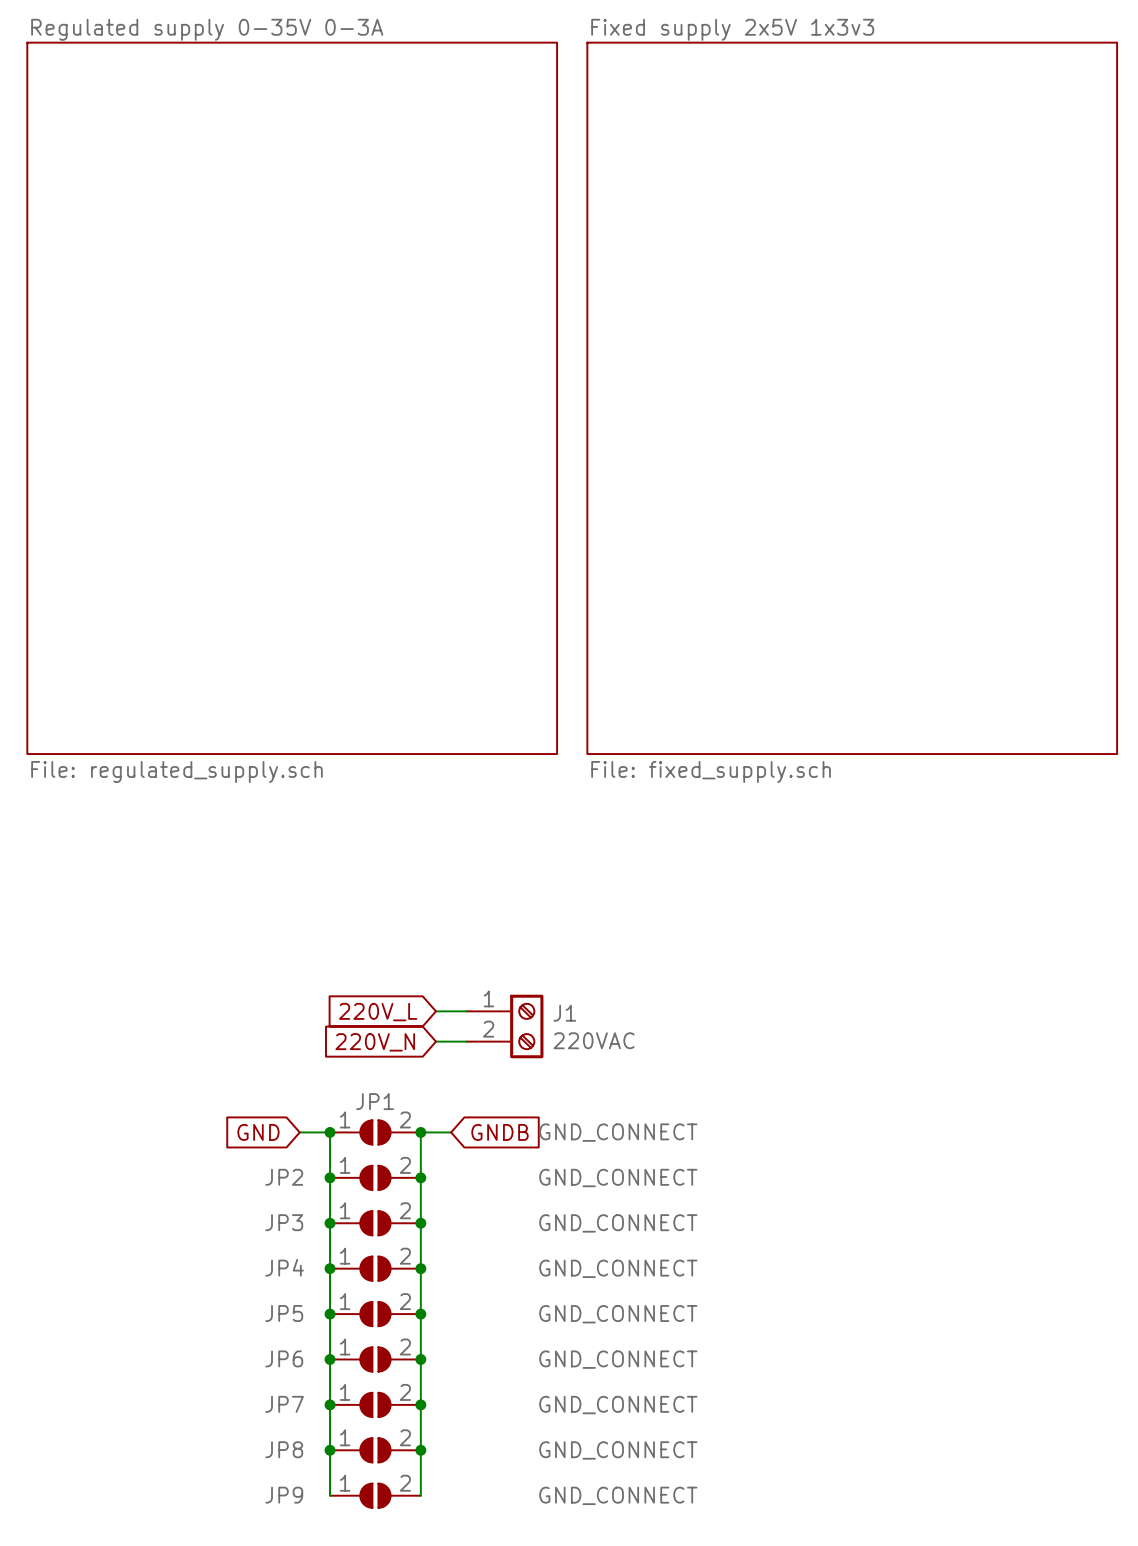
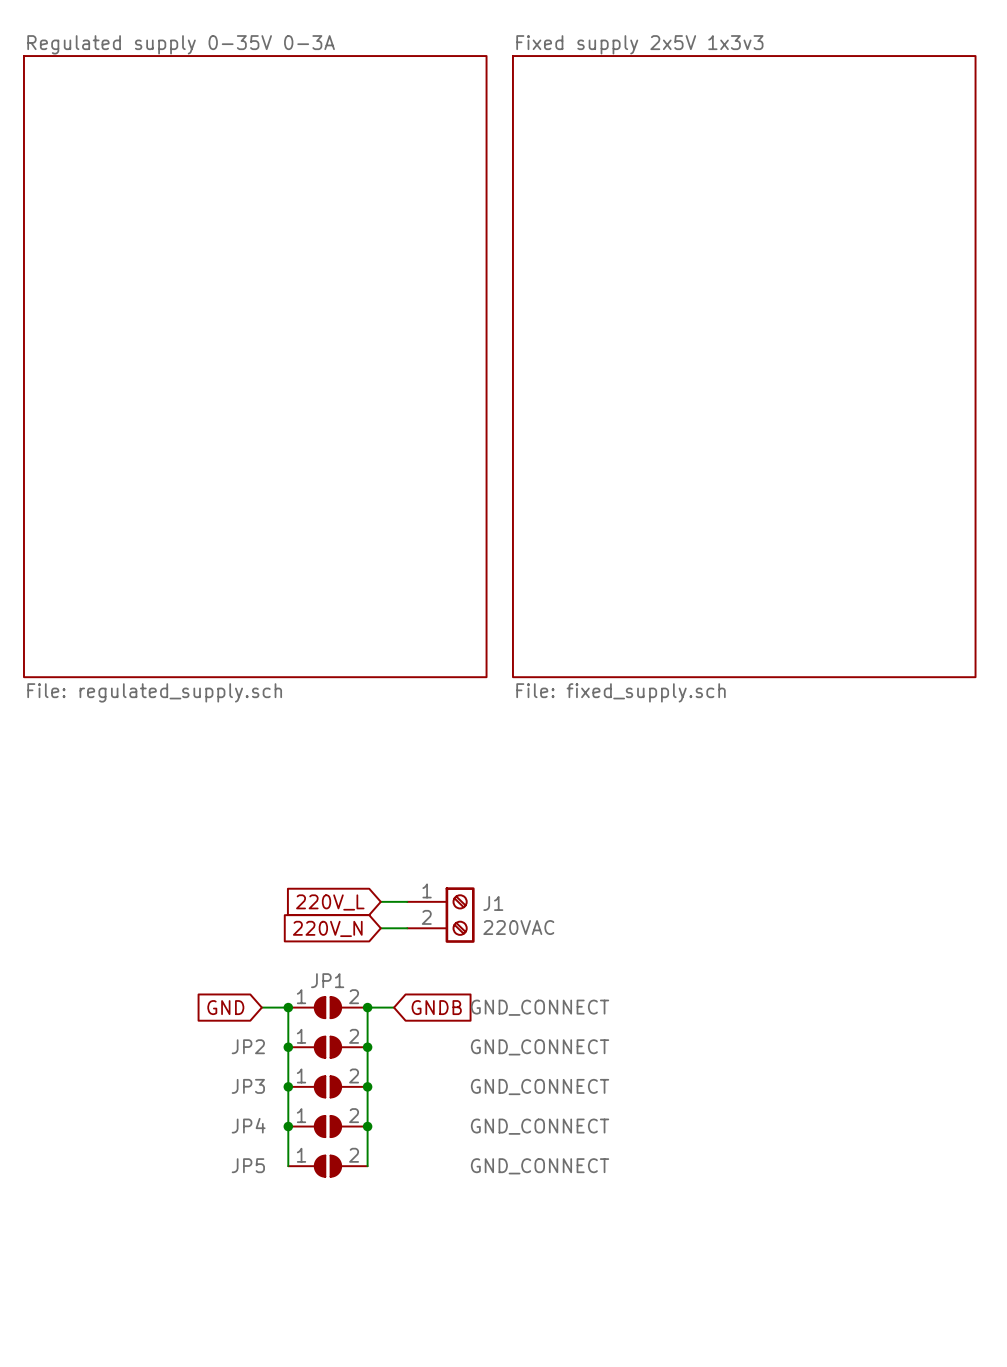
wire: (330, 1314) (330, 1495) -> none
junction: (330, 1314) -> none
wire: (420, 1314) (420, 1495) -> none
junction: (420, 1314) -> none
junction: (330, 1359) -> none
JP6: GND_CONNECT (375, 1359) -> none
junction: (420, 1359) -> none
junction: (330, 1404) -> none
JP7: GND_CONNECT (375, 1404) -> none
junction: (420, 1404) -> none
junction: (330, 1450) -> none
JP8: GND_CONNECT (375, 1450) -> none
junction: (420, 1450) -> none
JP9: GND_CONNECT (375, 1495) -> none

